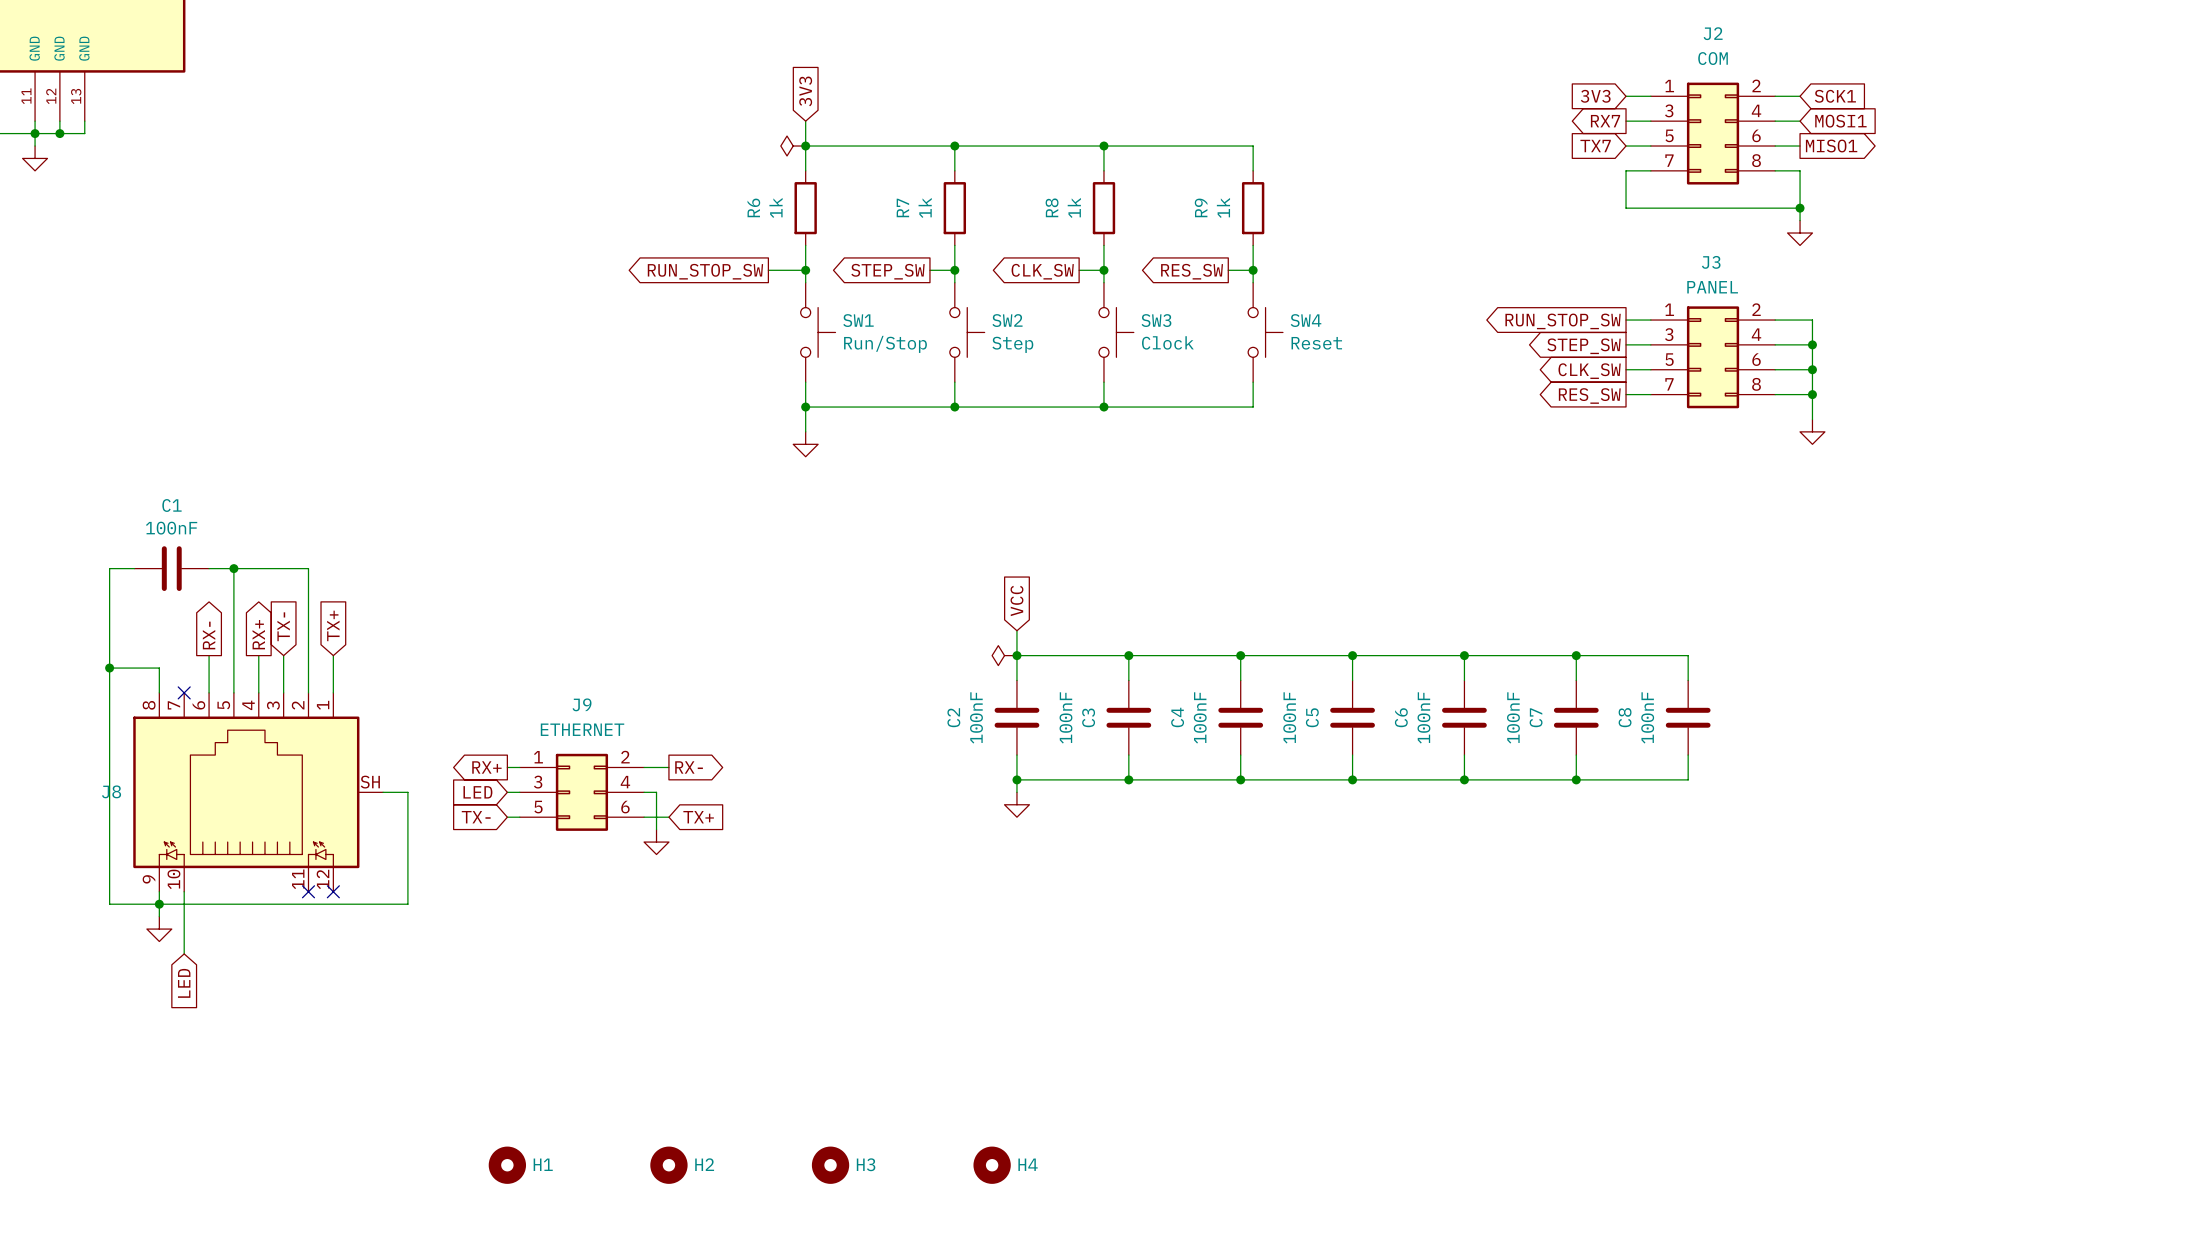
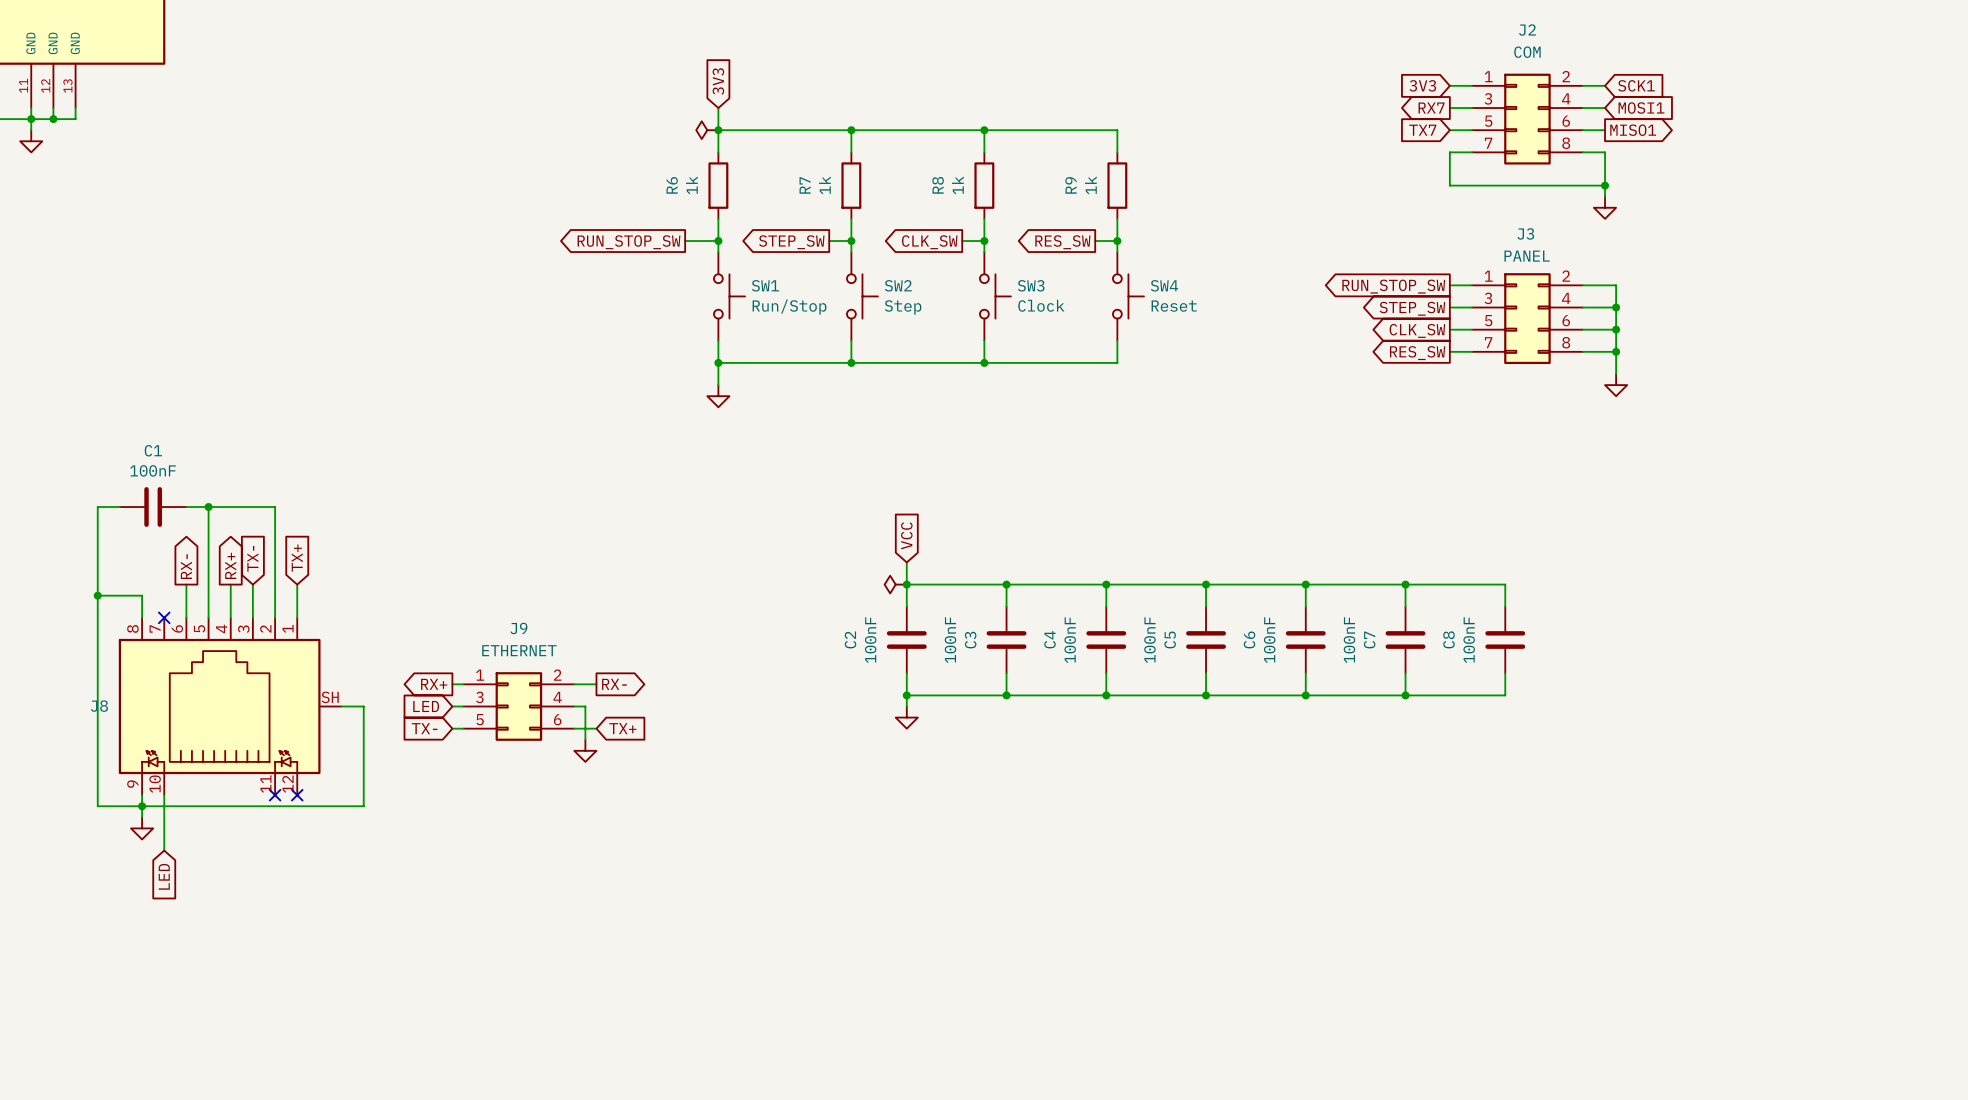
H1: (507, 1165) -> none
H2: (668, 1165) -> none
H3: (830, 1165) -> none
H4: (992, 1165) -> none

